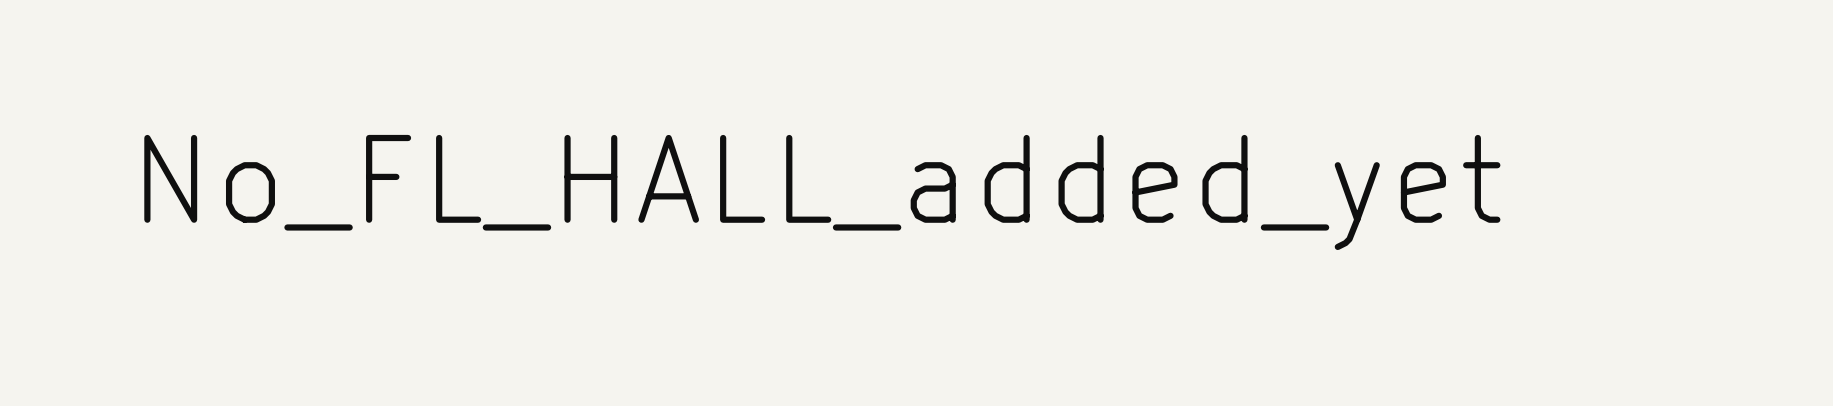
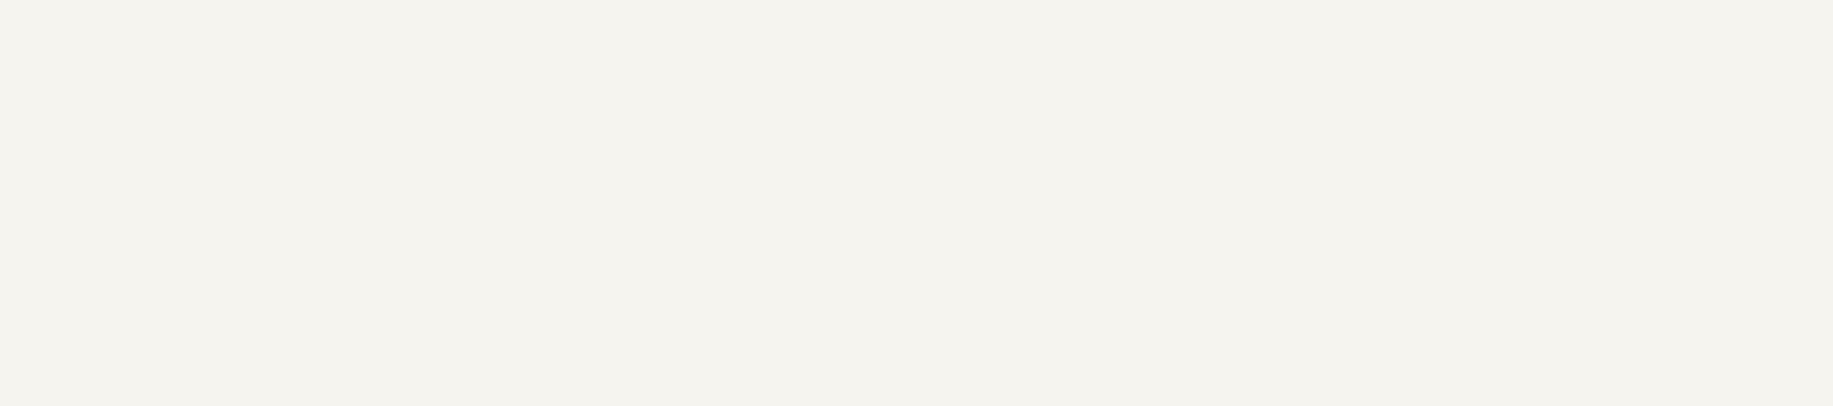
label: No_FL_HALL_added_yet (822, 192) -> none

